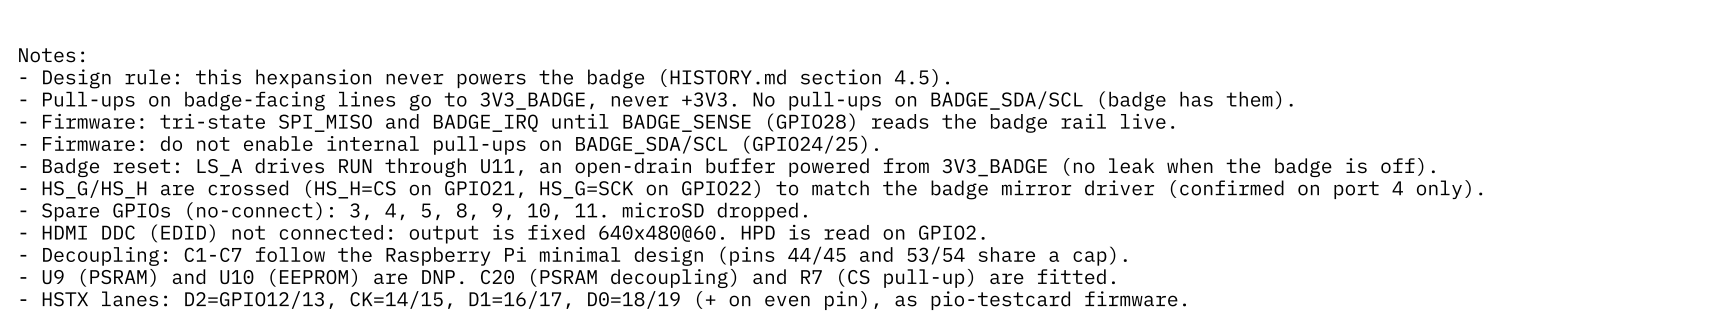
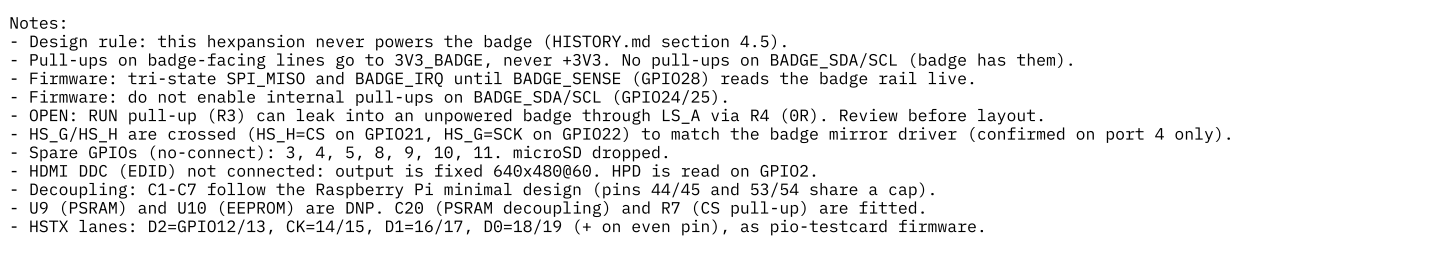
text: - Badge reset: LS_A drives RUN through U11, an open-drain buffer powered from 3V3_BADGE (no leak when the badge is off). (727, 167) -> - OPEN: RUN pull-up (R3) can leak into an unpowered badge through LS_A via R4 (0R). Review before layout. (527, 116)

